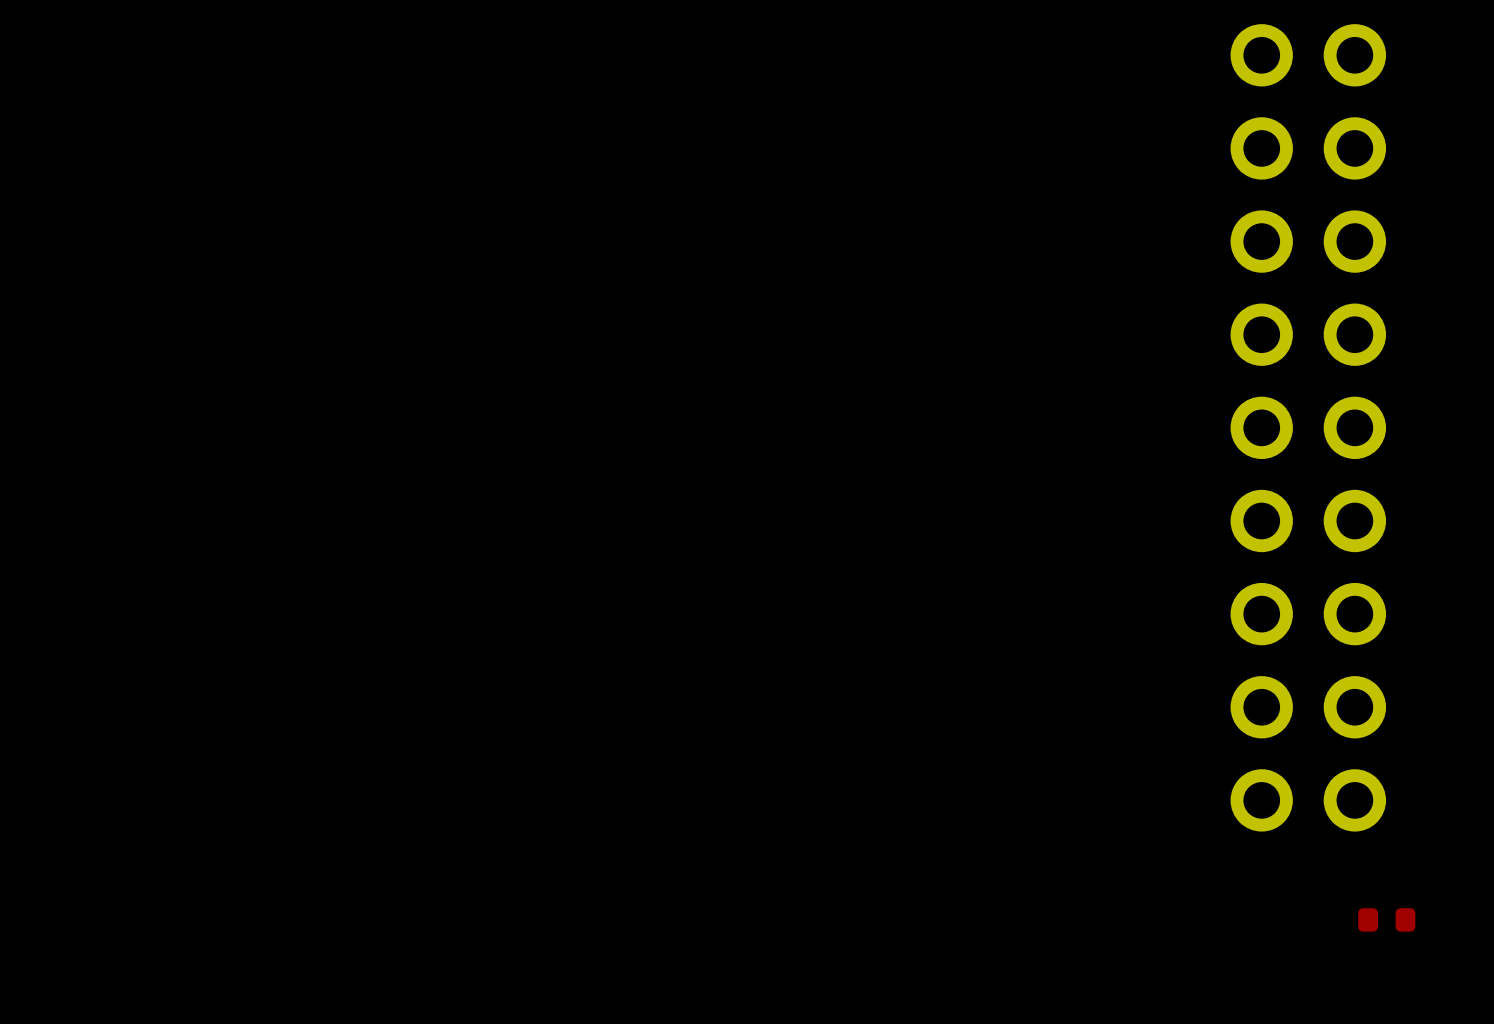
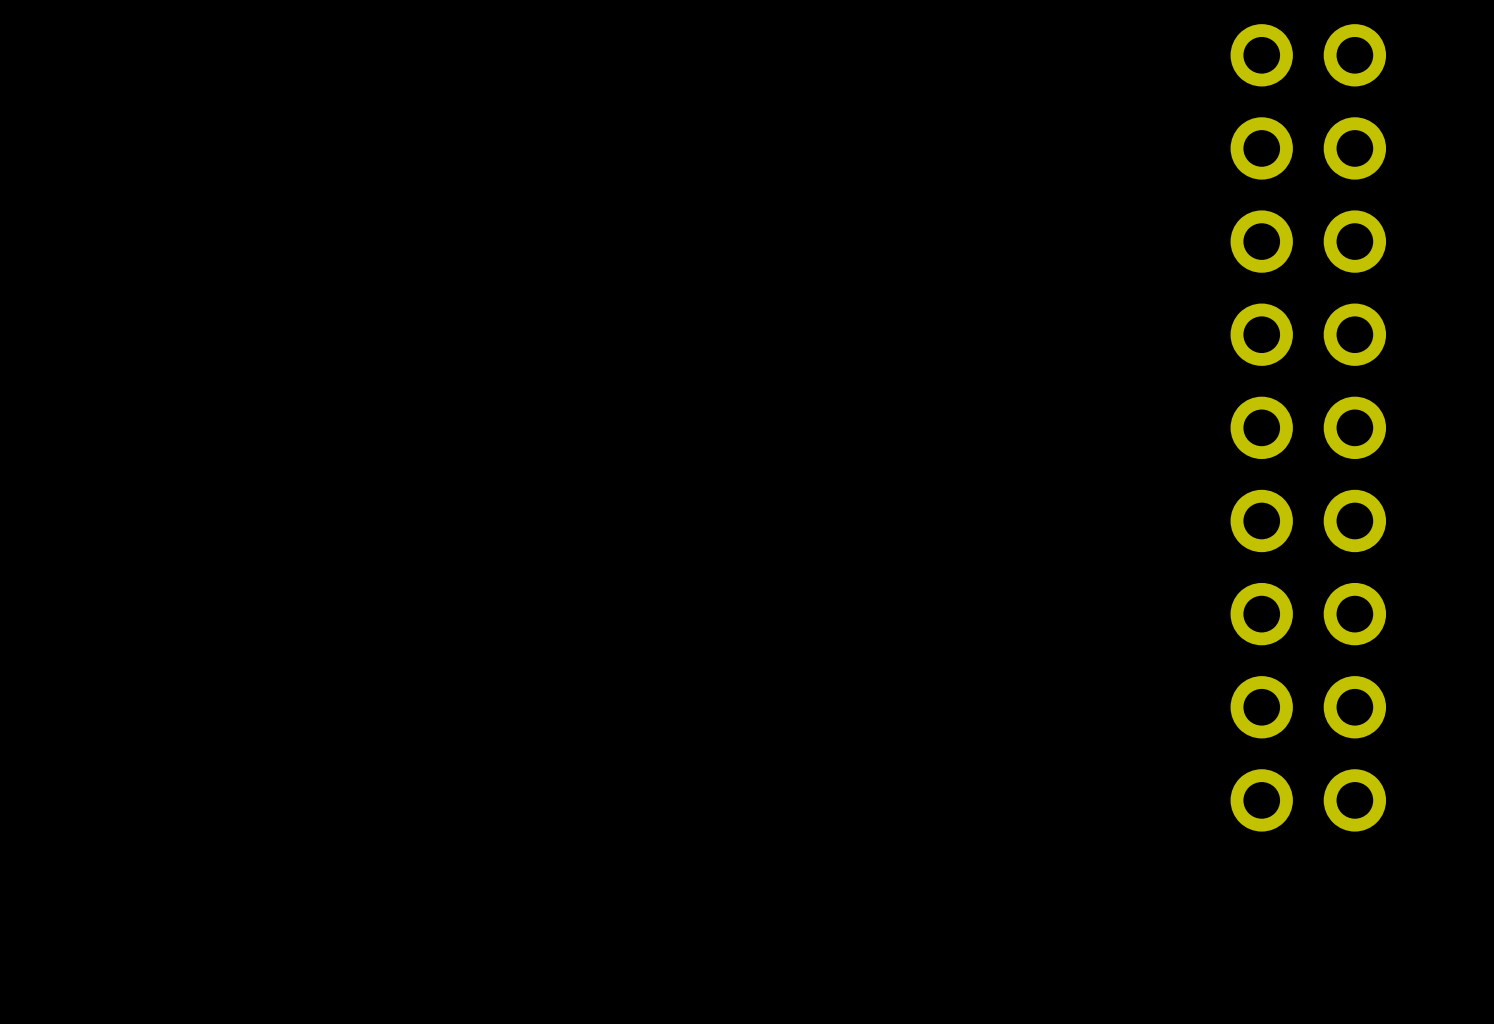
part: (1386, 919) -> none

